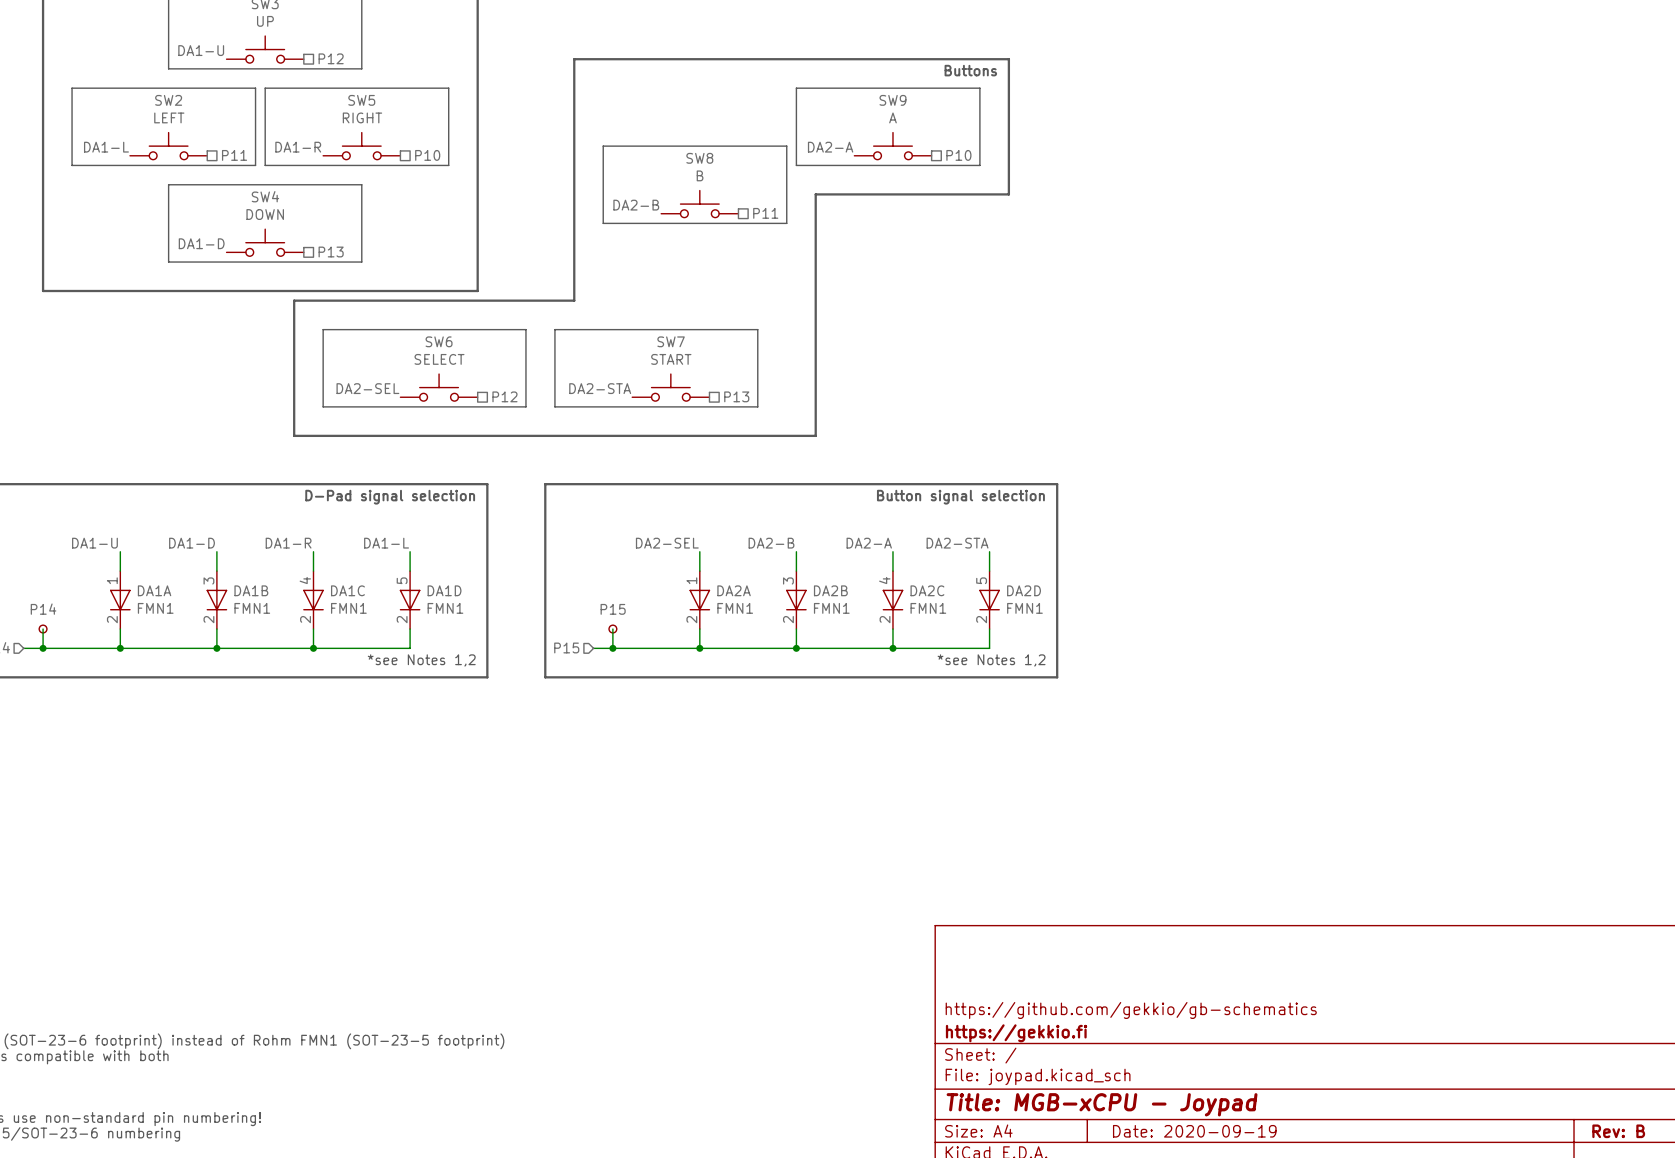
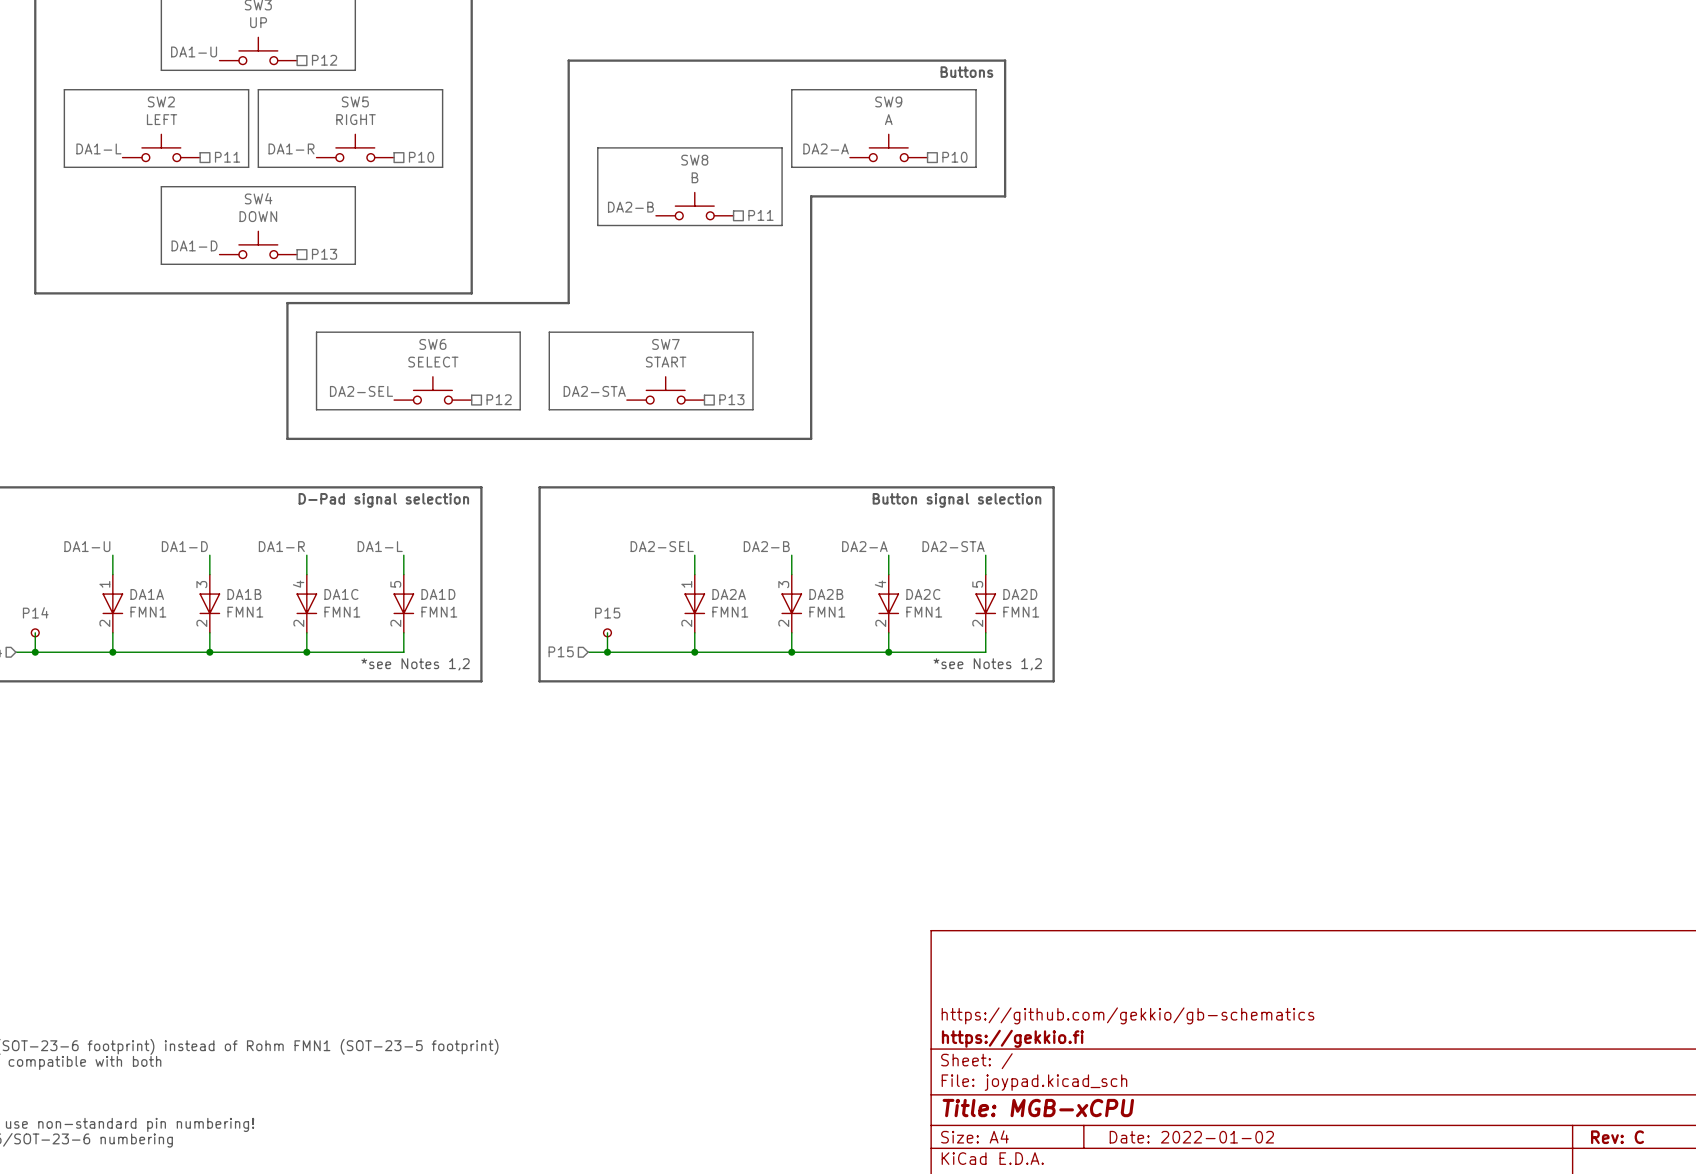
title block: Title: MGB-xCPU - Joypad (1102, 1104) -> Title: MGB-xCPU (1038, 1108)
title block: Date: 2020-09-19 (1194, 1131) -> Date: 2022-01-02 (1191, 1137)
title block: Rev: B (1618, 1131) -> Rev: C (1617, 1137)

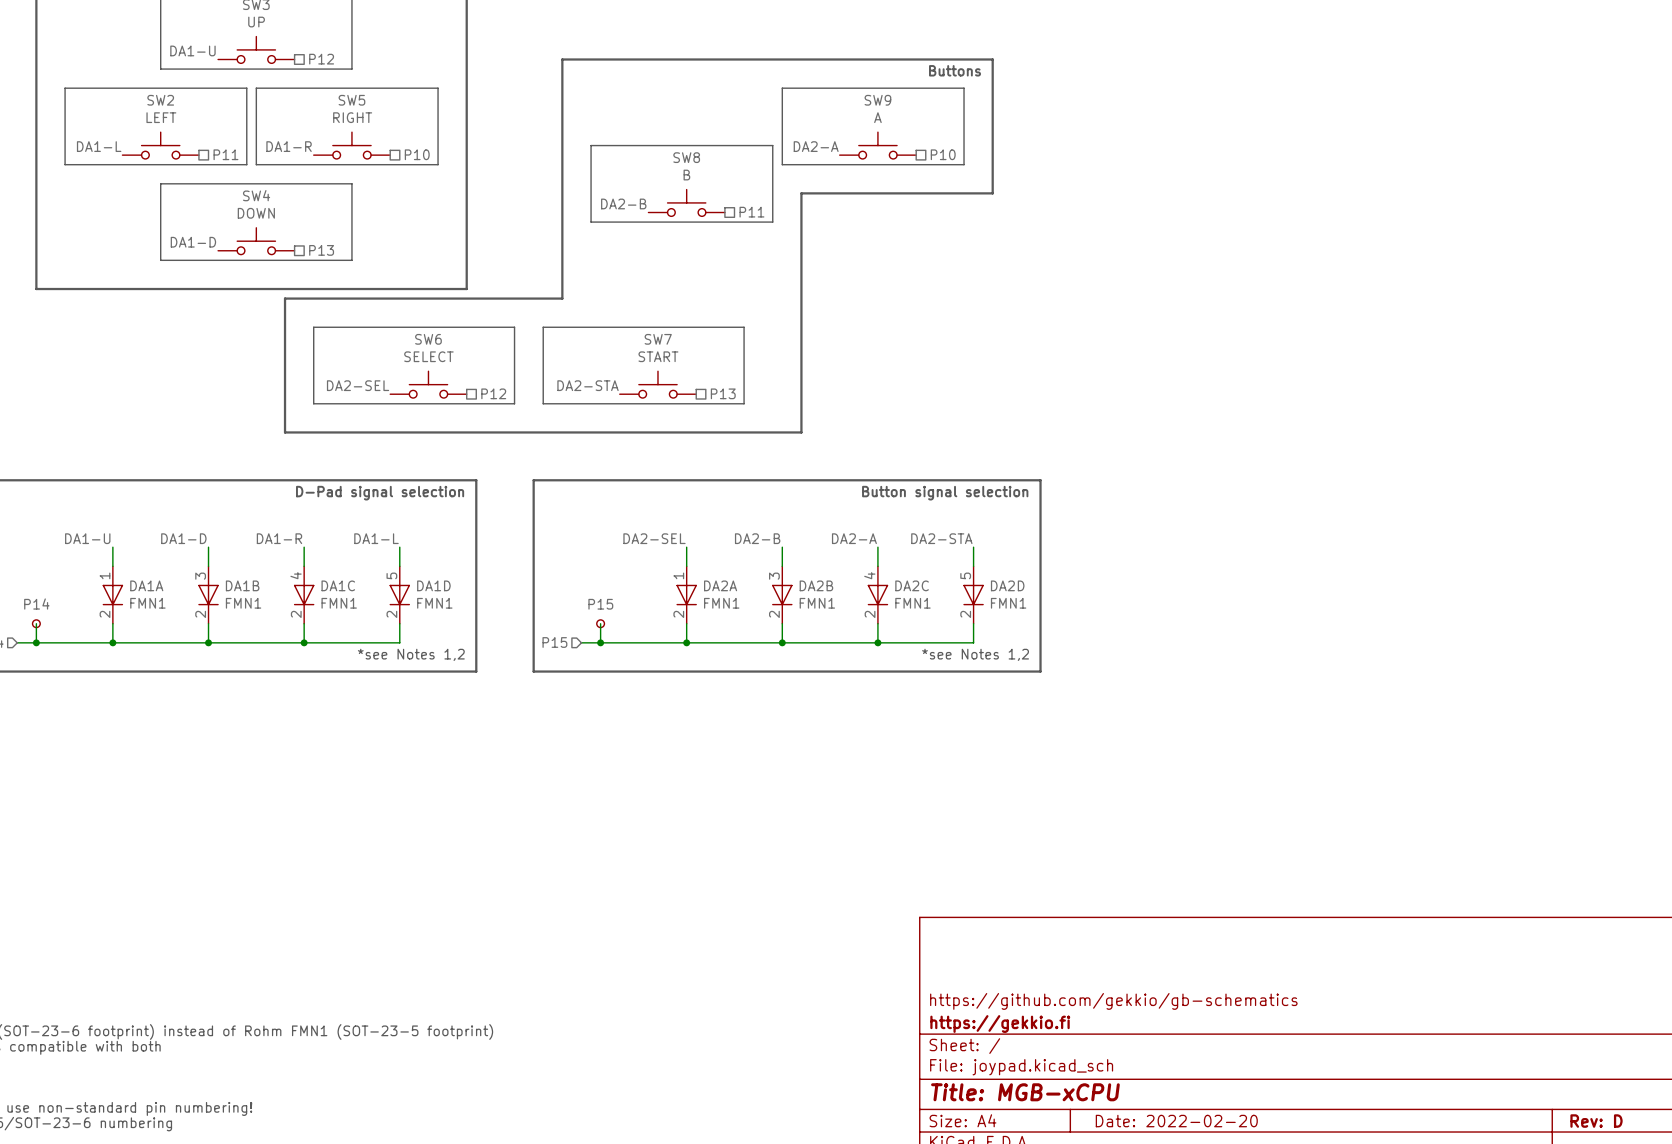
title block: Date: 2022-01-02 (1191, 1137) -> Date: 2022-02-20 (1176, 1121)
title block: Rev: C (1617, 1137) -> Rev: D (1596, 1121)

